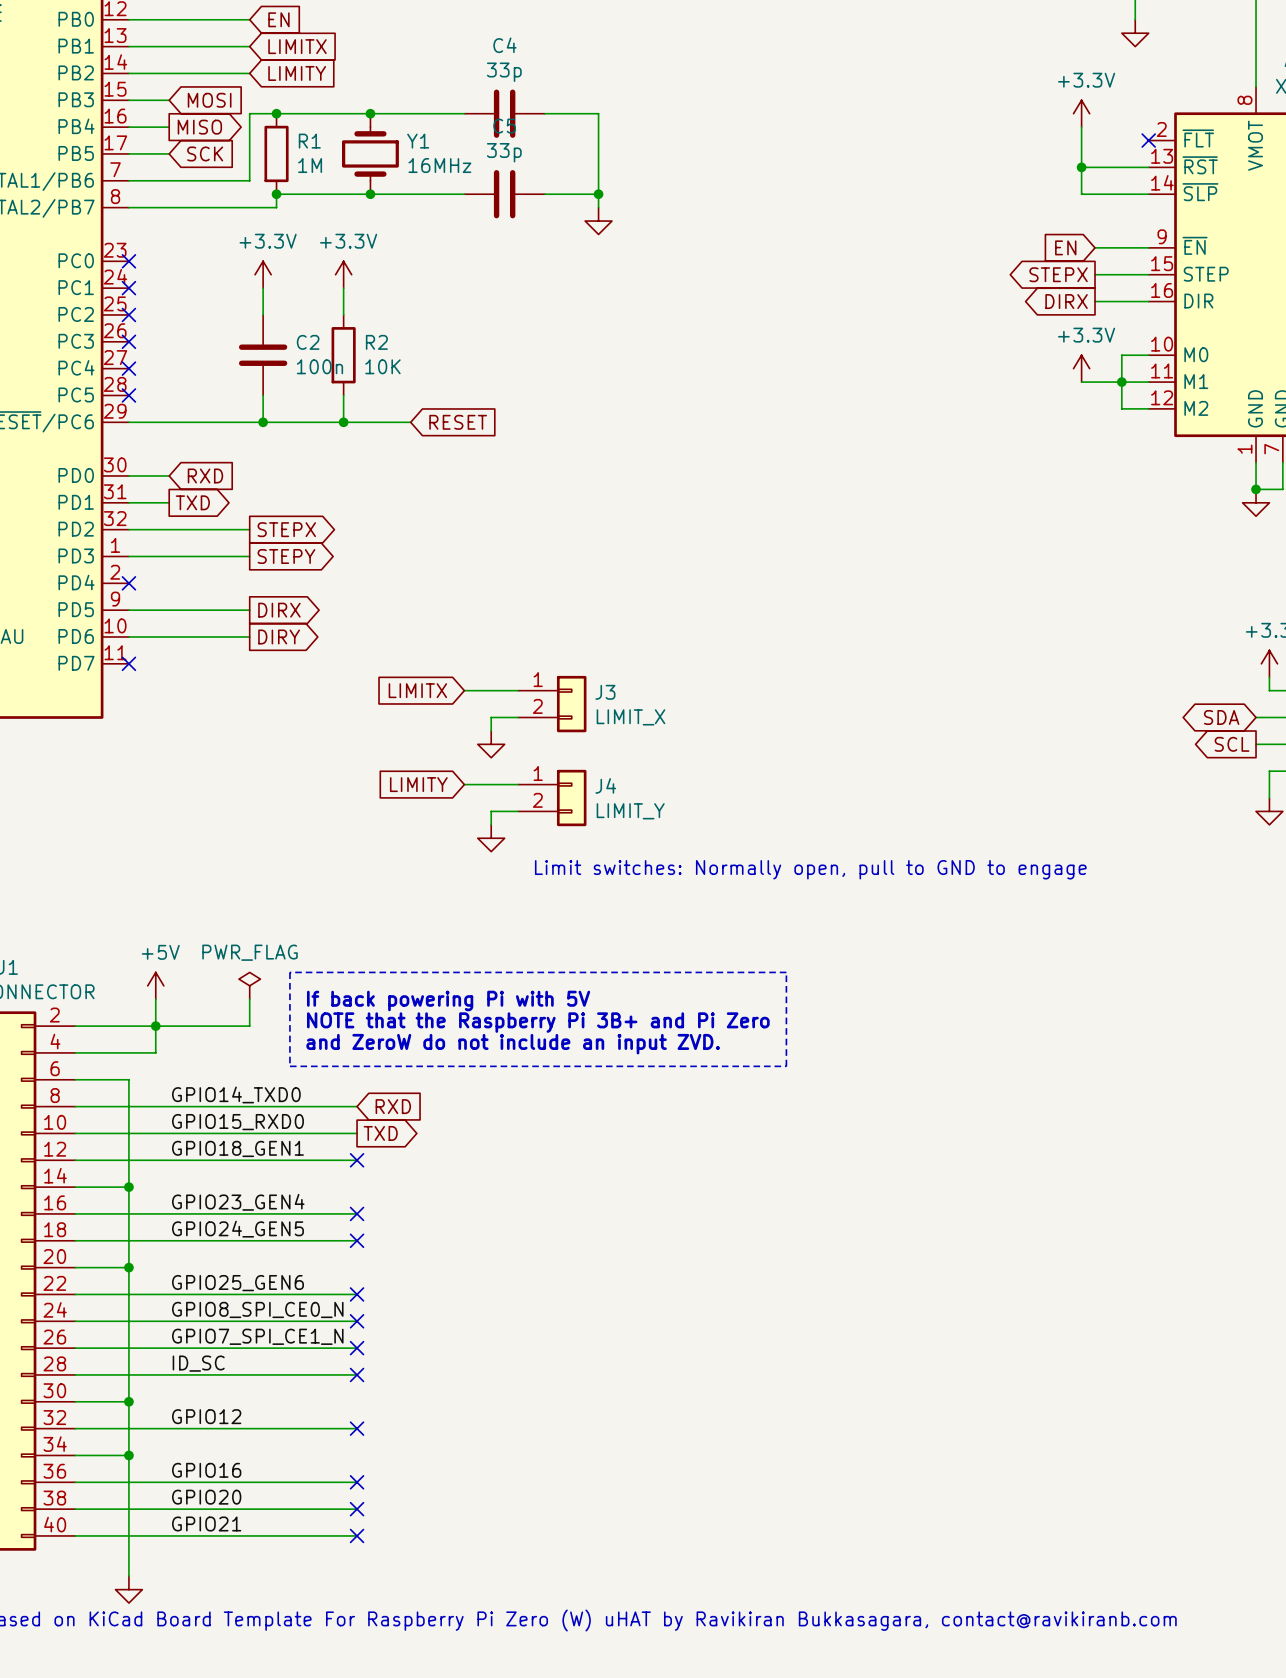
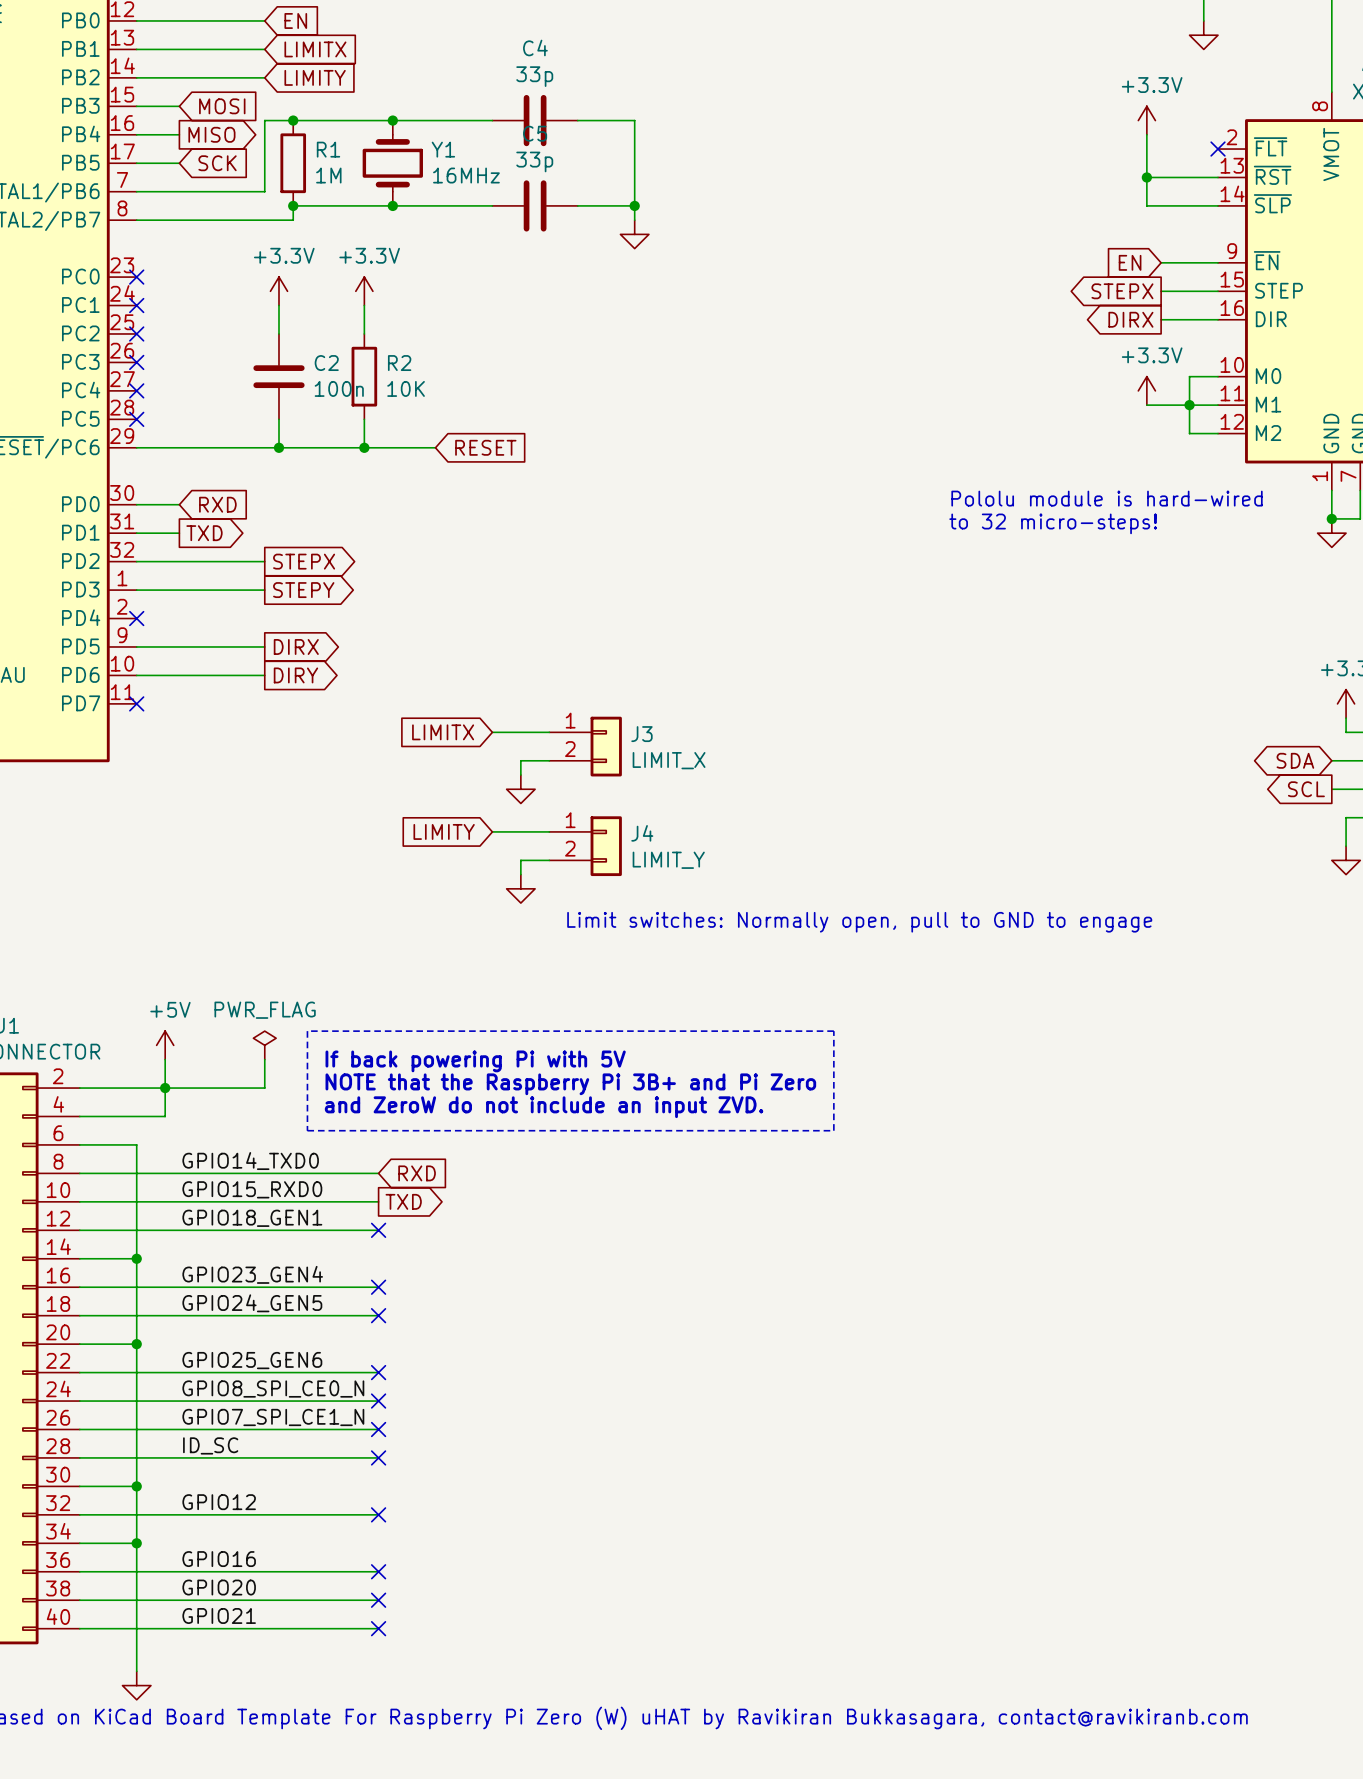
text: none -> Pololu module is hard-wired (1107, 498)
text: none -> to 32 micro-steps! (1053, 523)

